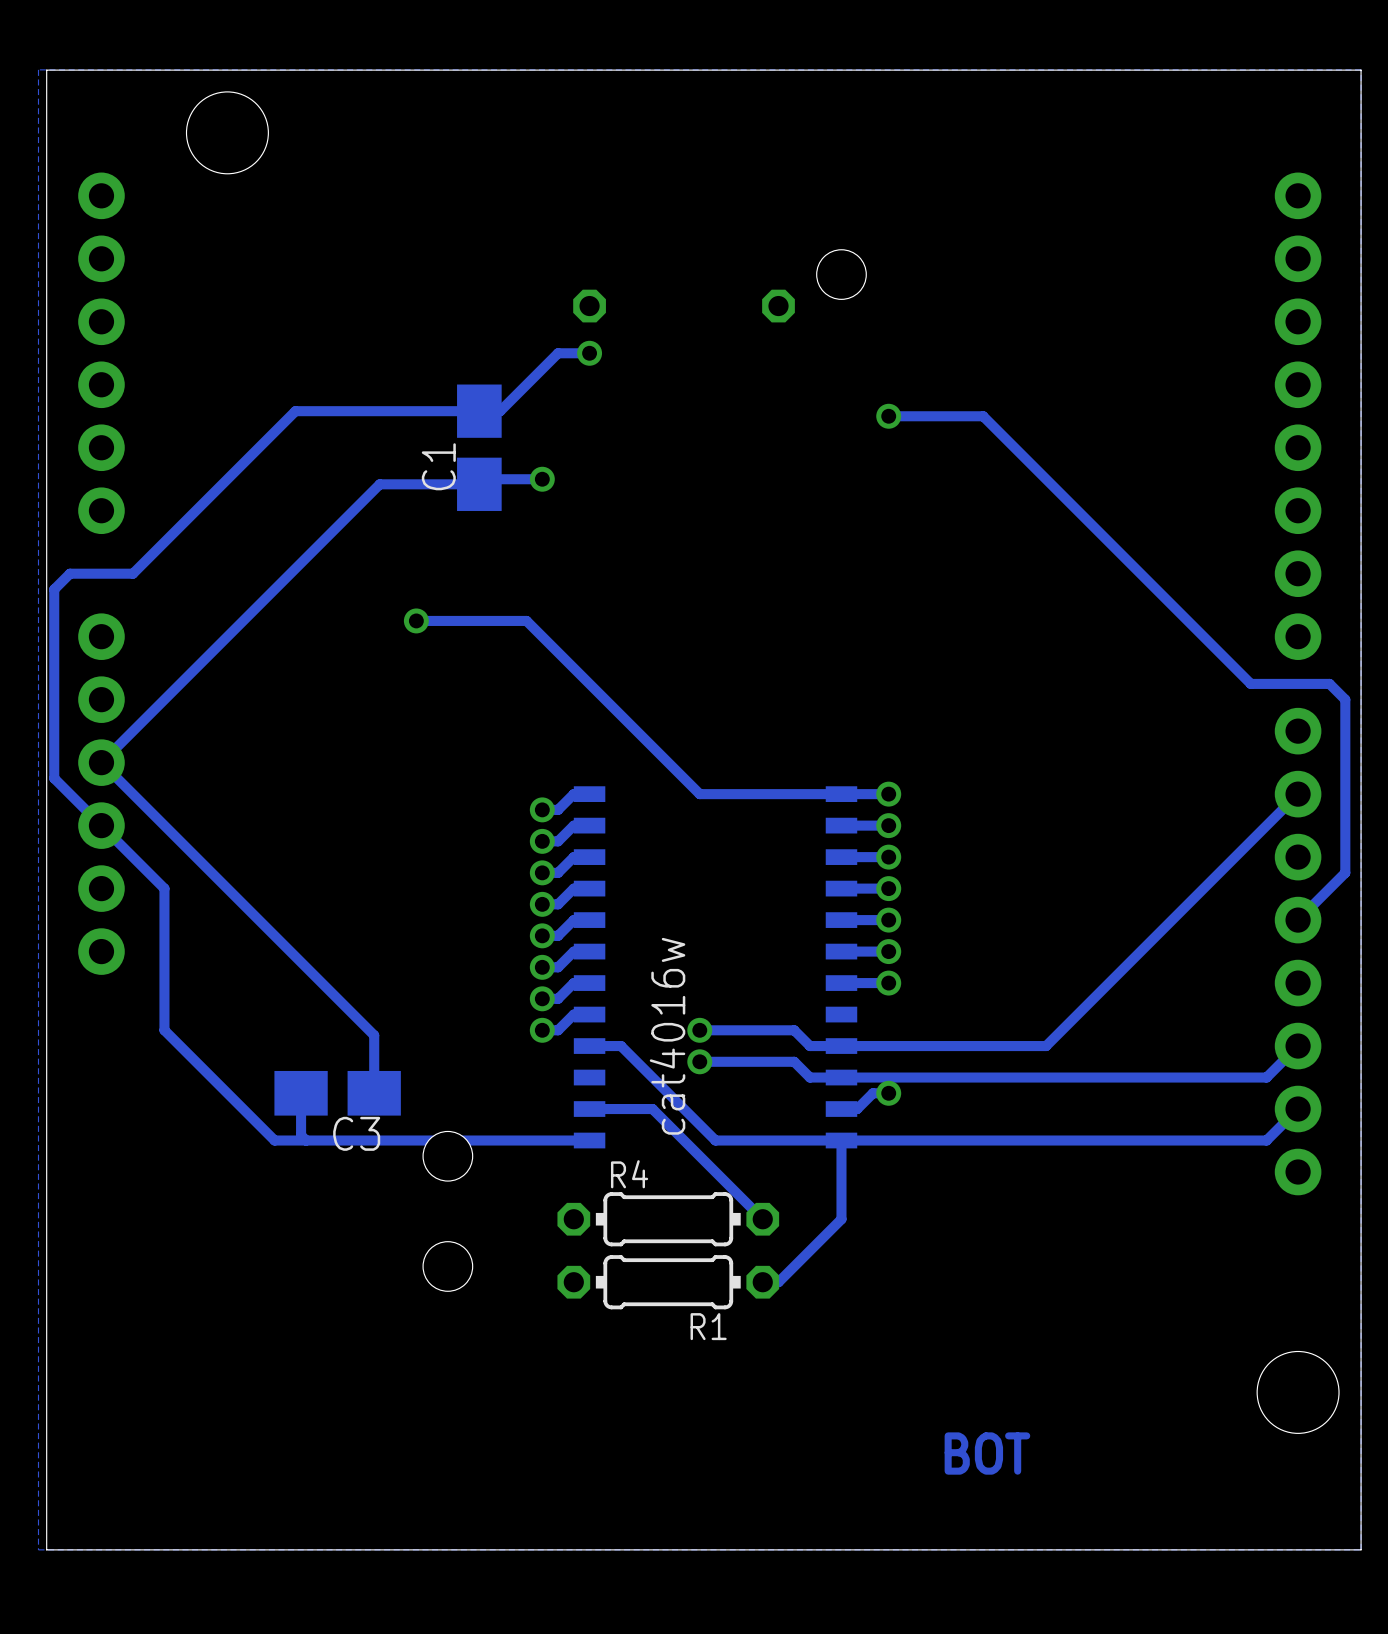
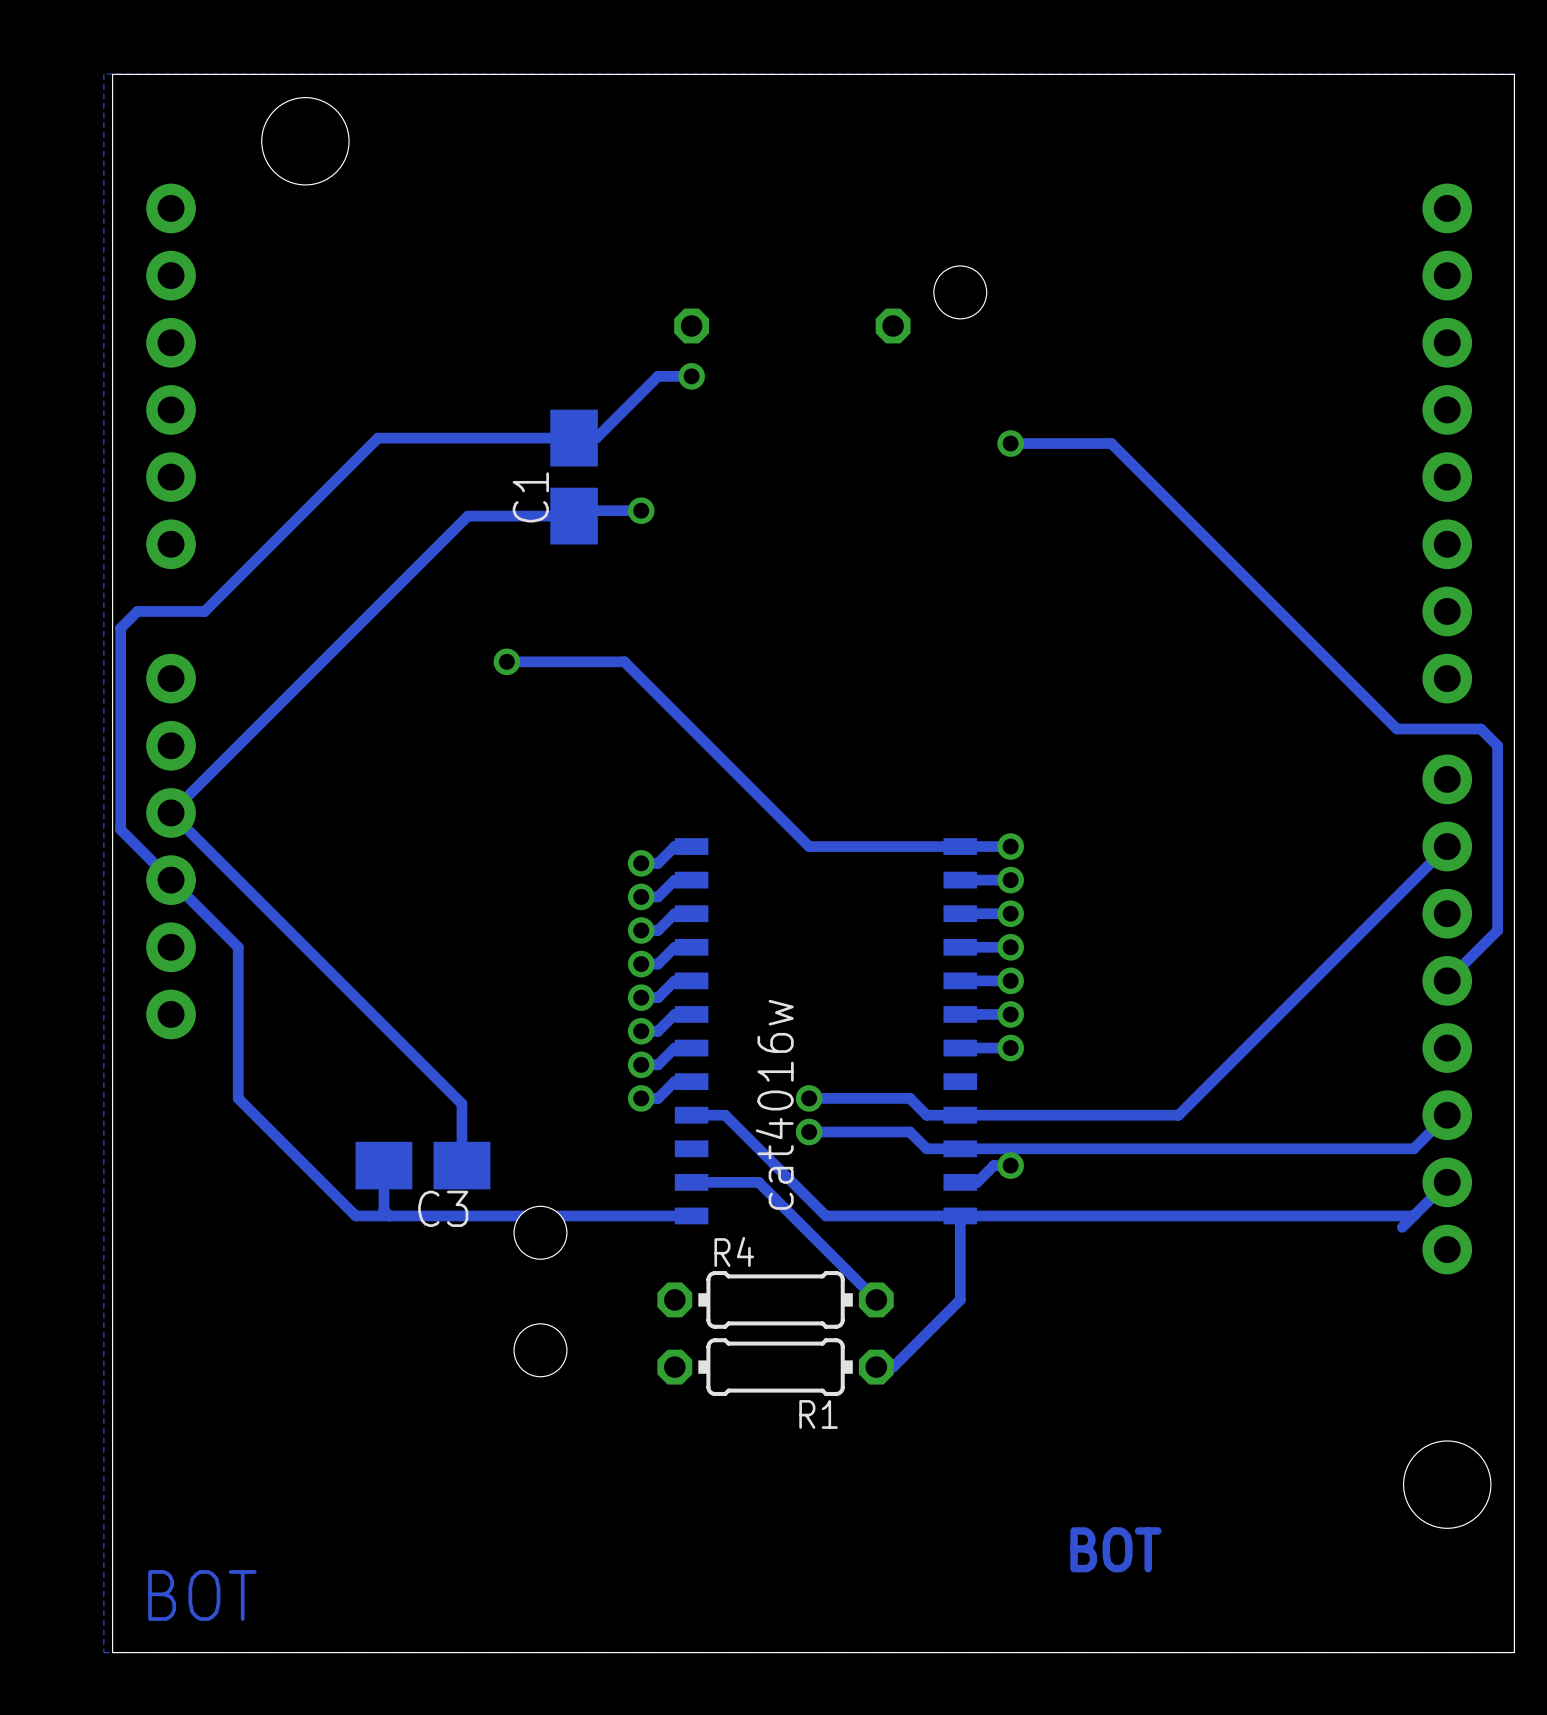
track: none -> (1413, 1215) (1402, 1227)
text: none -> BOT (202, 1595)

